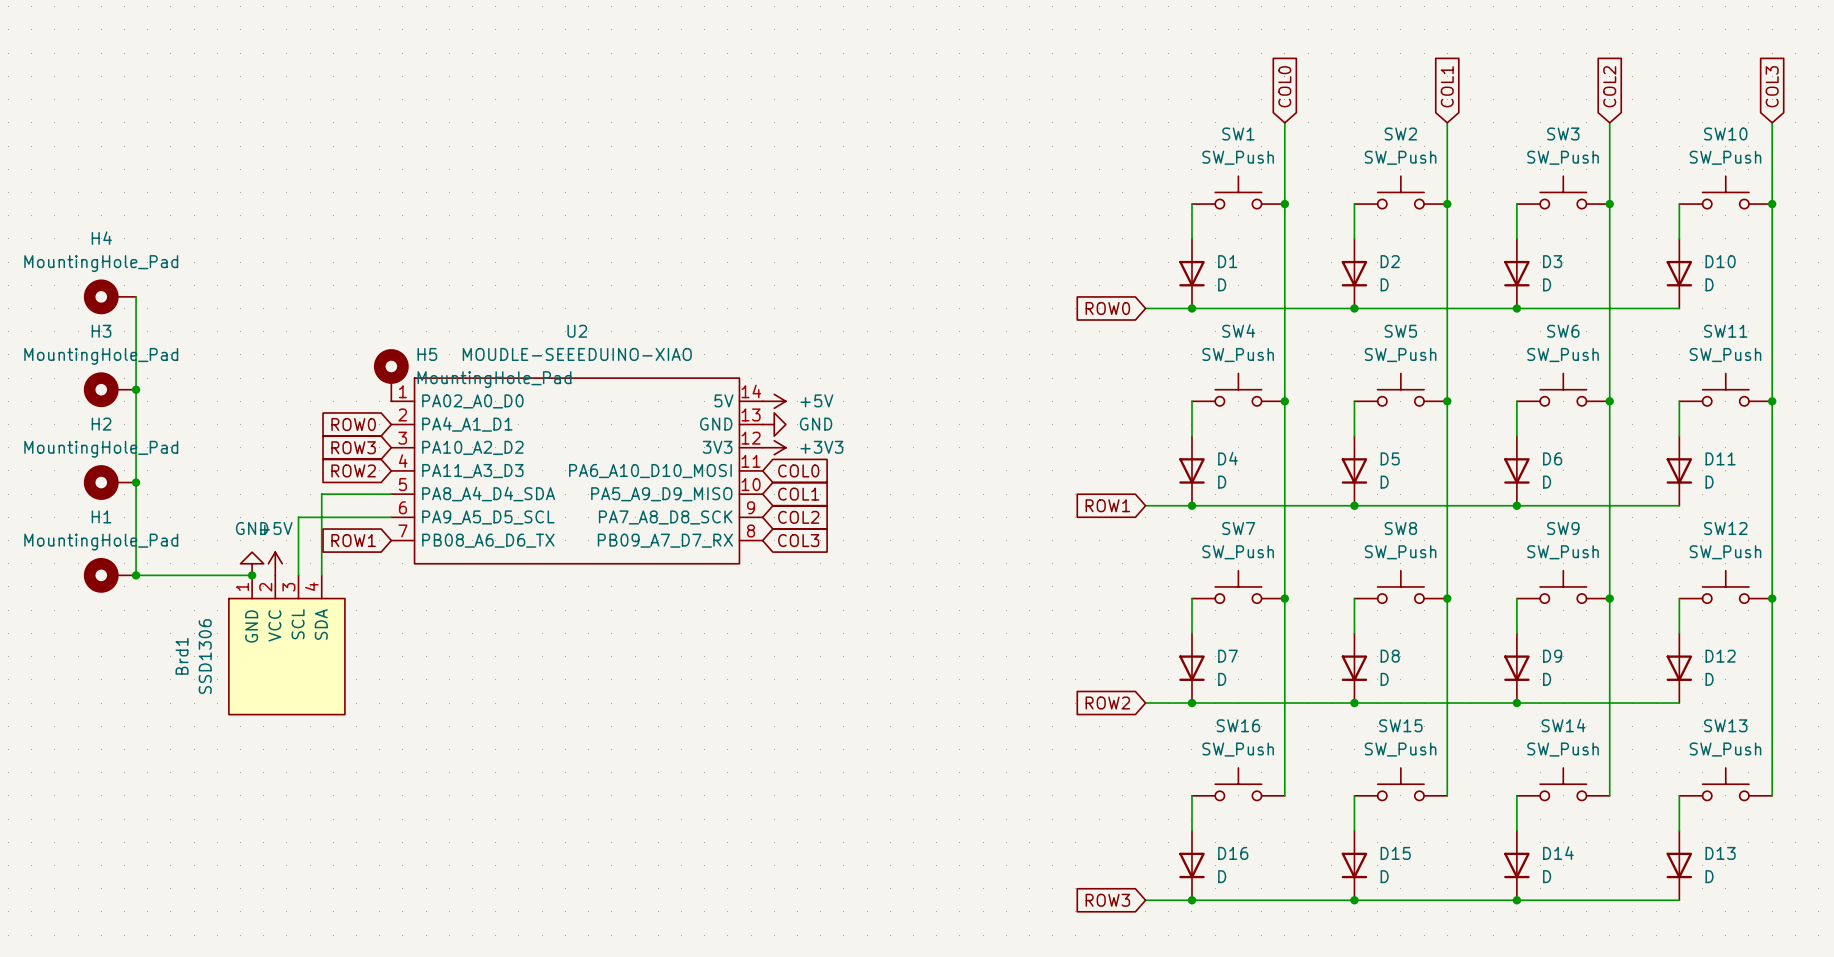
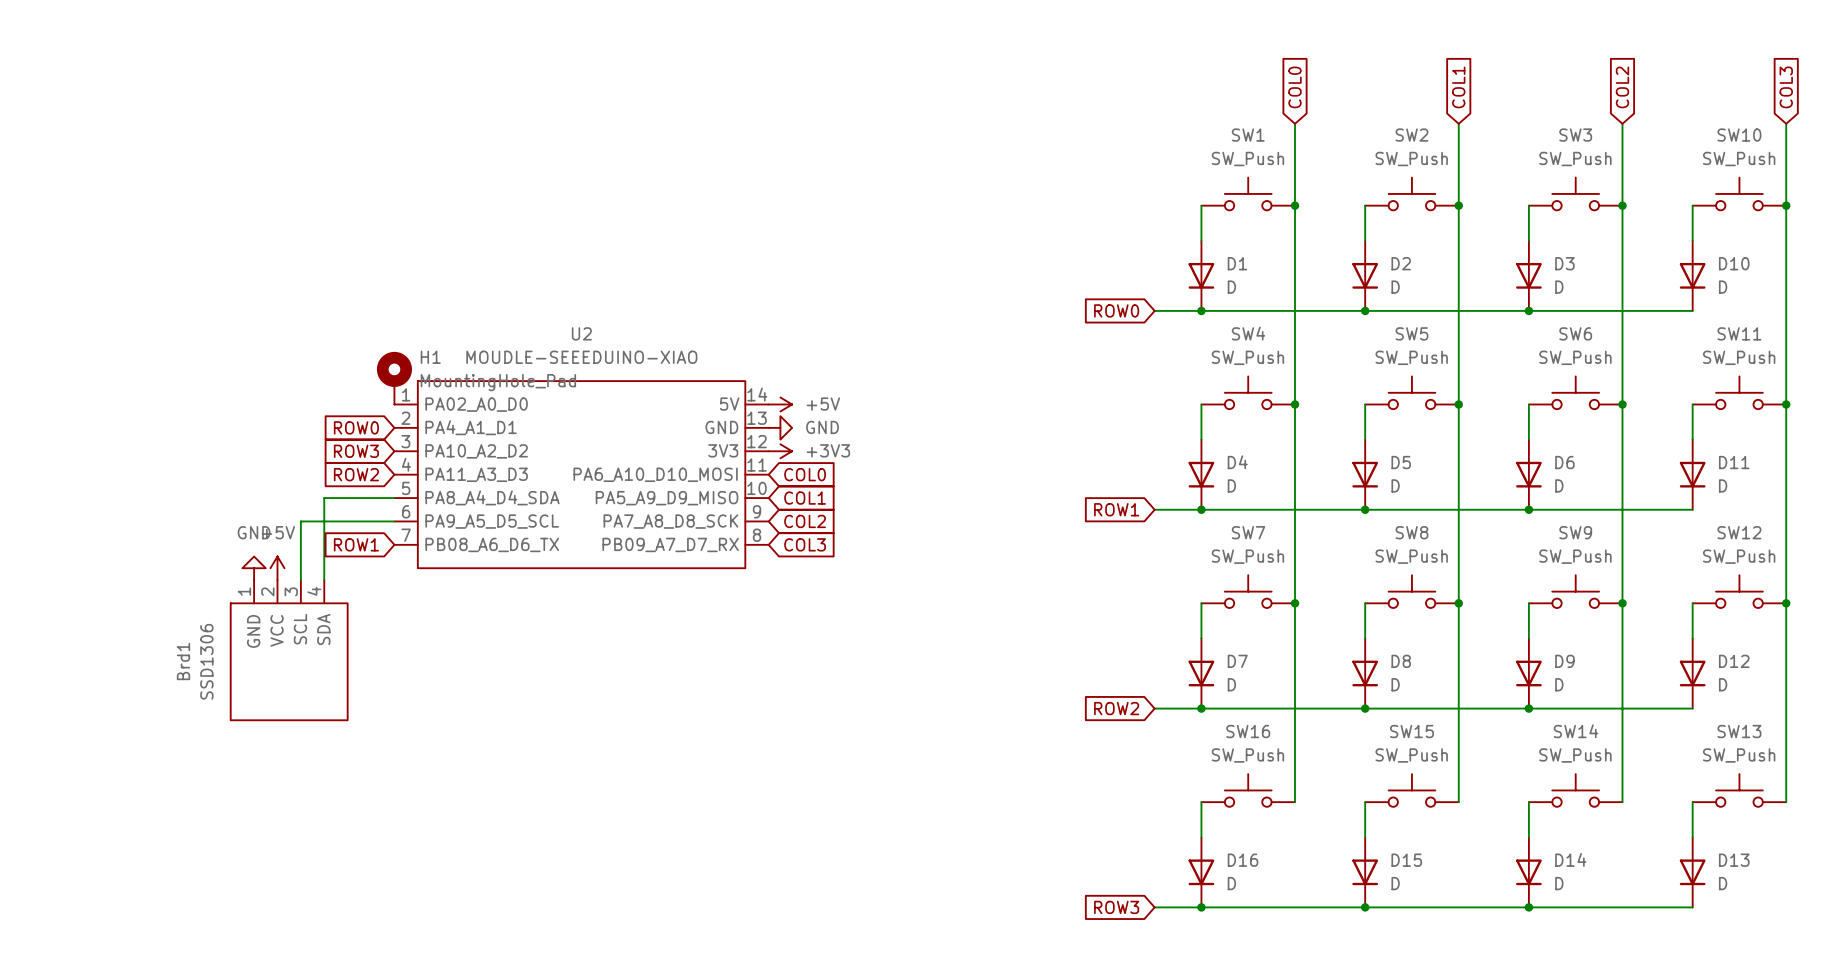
H4: MountingHole_Pad (109, 296) -> none
wire: (136, 296) (136, 575) (252, 575) -> none
H5 name: H5 (427, 354) -> H1 (430, 357)
H3: MountingHole_Pad (109, 389) -> none
junction: (136, 389) -> none
H2: MountingHole_Pad (109, 482) -> none
junction: (136, 482) -> none
H1: MountingHole_Pad (109, 575) -> none
junction: (136, 575) -> none
junction: (252, 575) -> none

